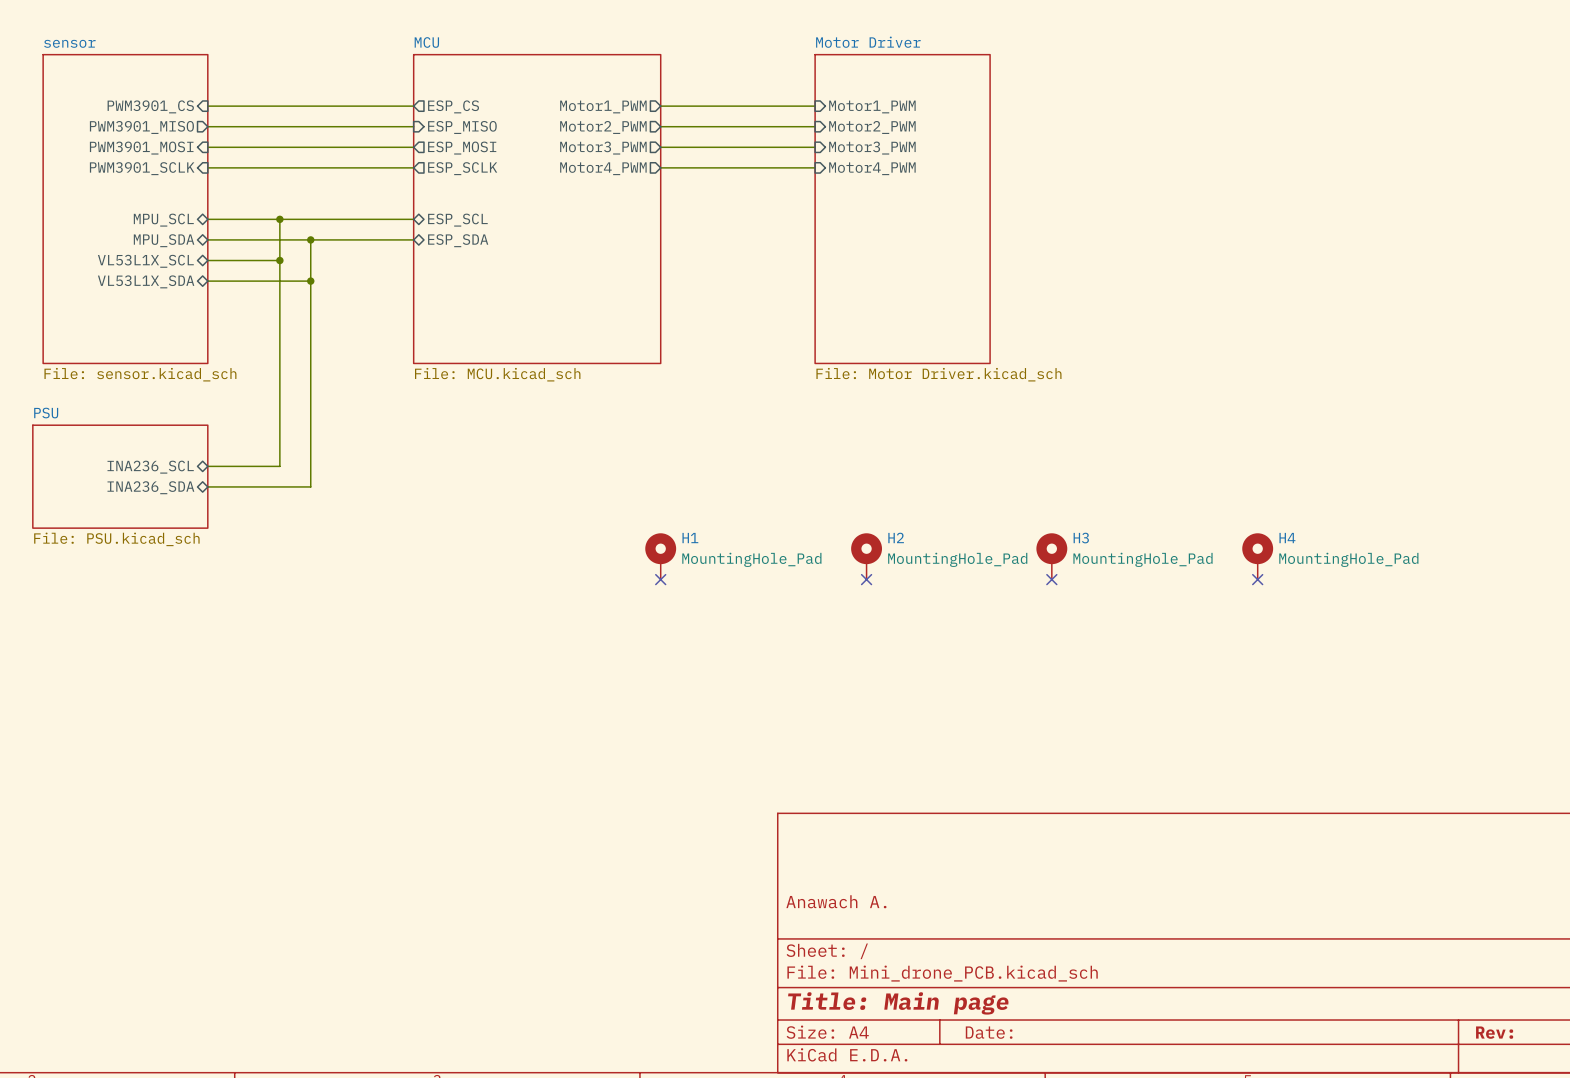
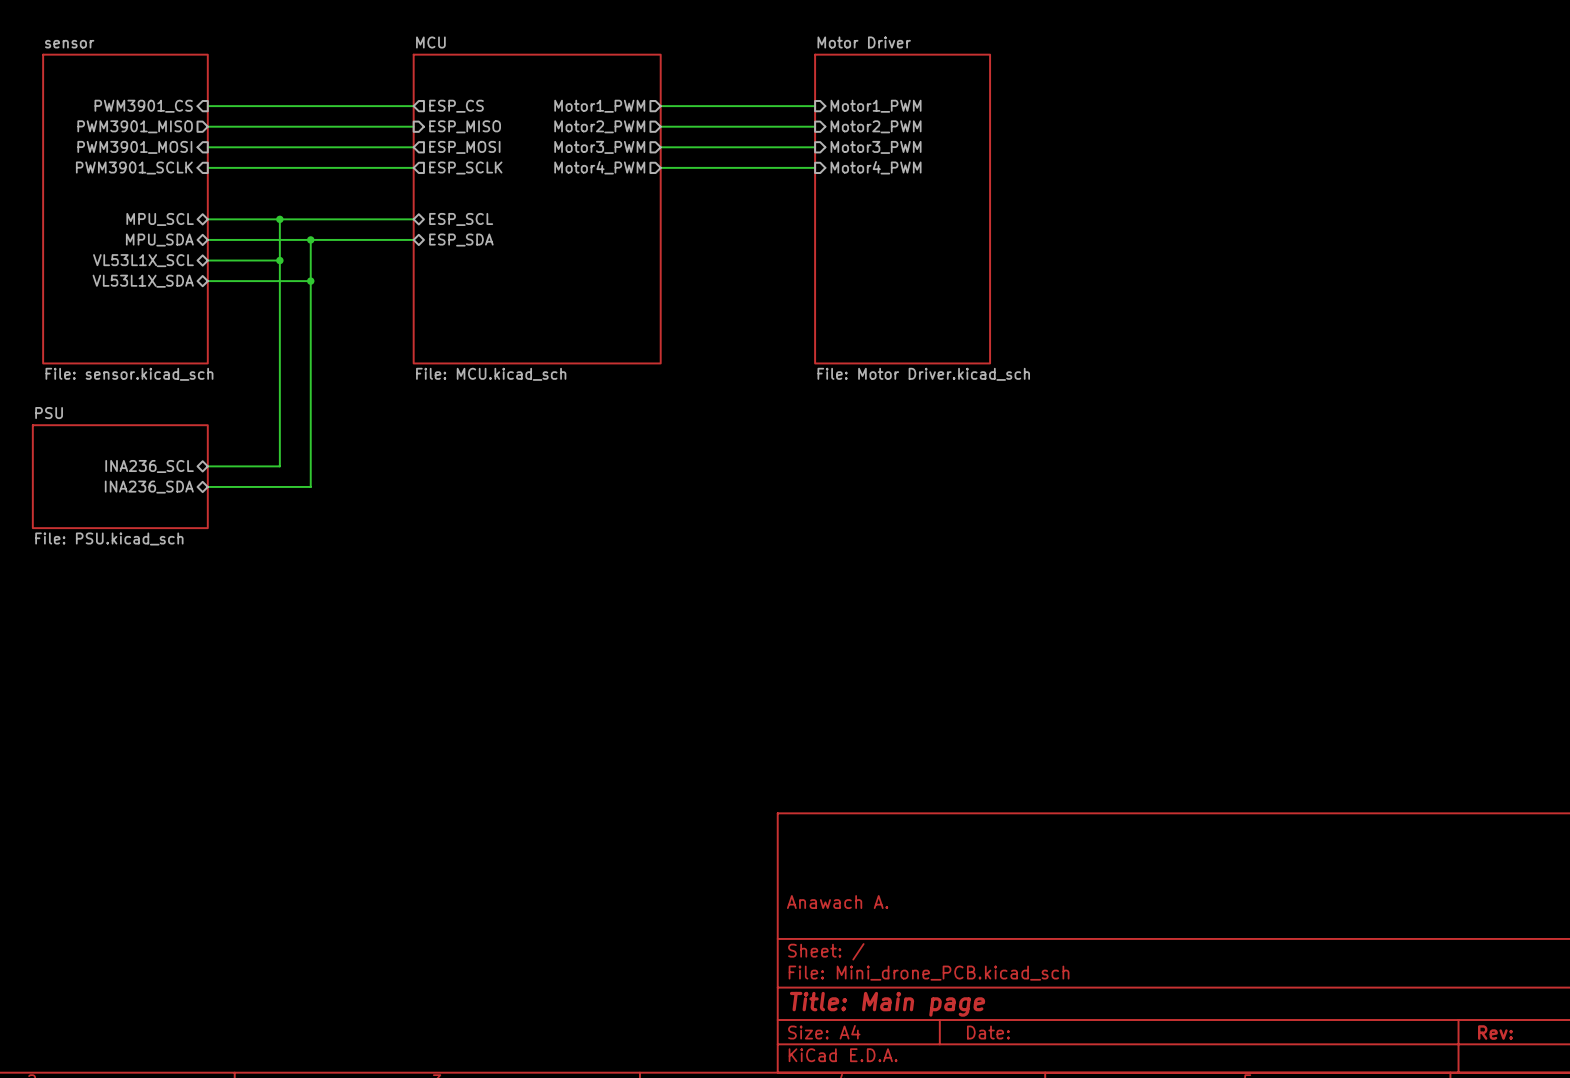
H1: MountingHole_Pad (660, 556) -> none
H2: MountingHole_Pad (866, 556) -> none
H3: MountingHole_Pad (1051, 556) -> none
H4: MountingHole_Pad (1257, 556) -> none
no-connect mark: (660, 579) -> none
no-connect mark: (866, 579) -> none
no-connect mark: (1051, 579) -> none
no-connect mark: (1257, 579) -> none

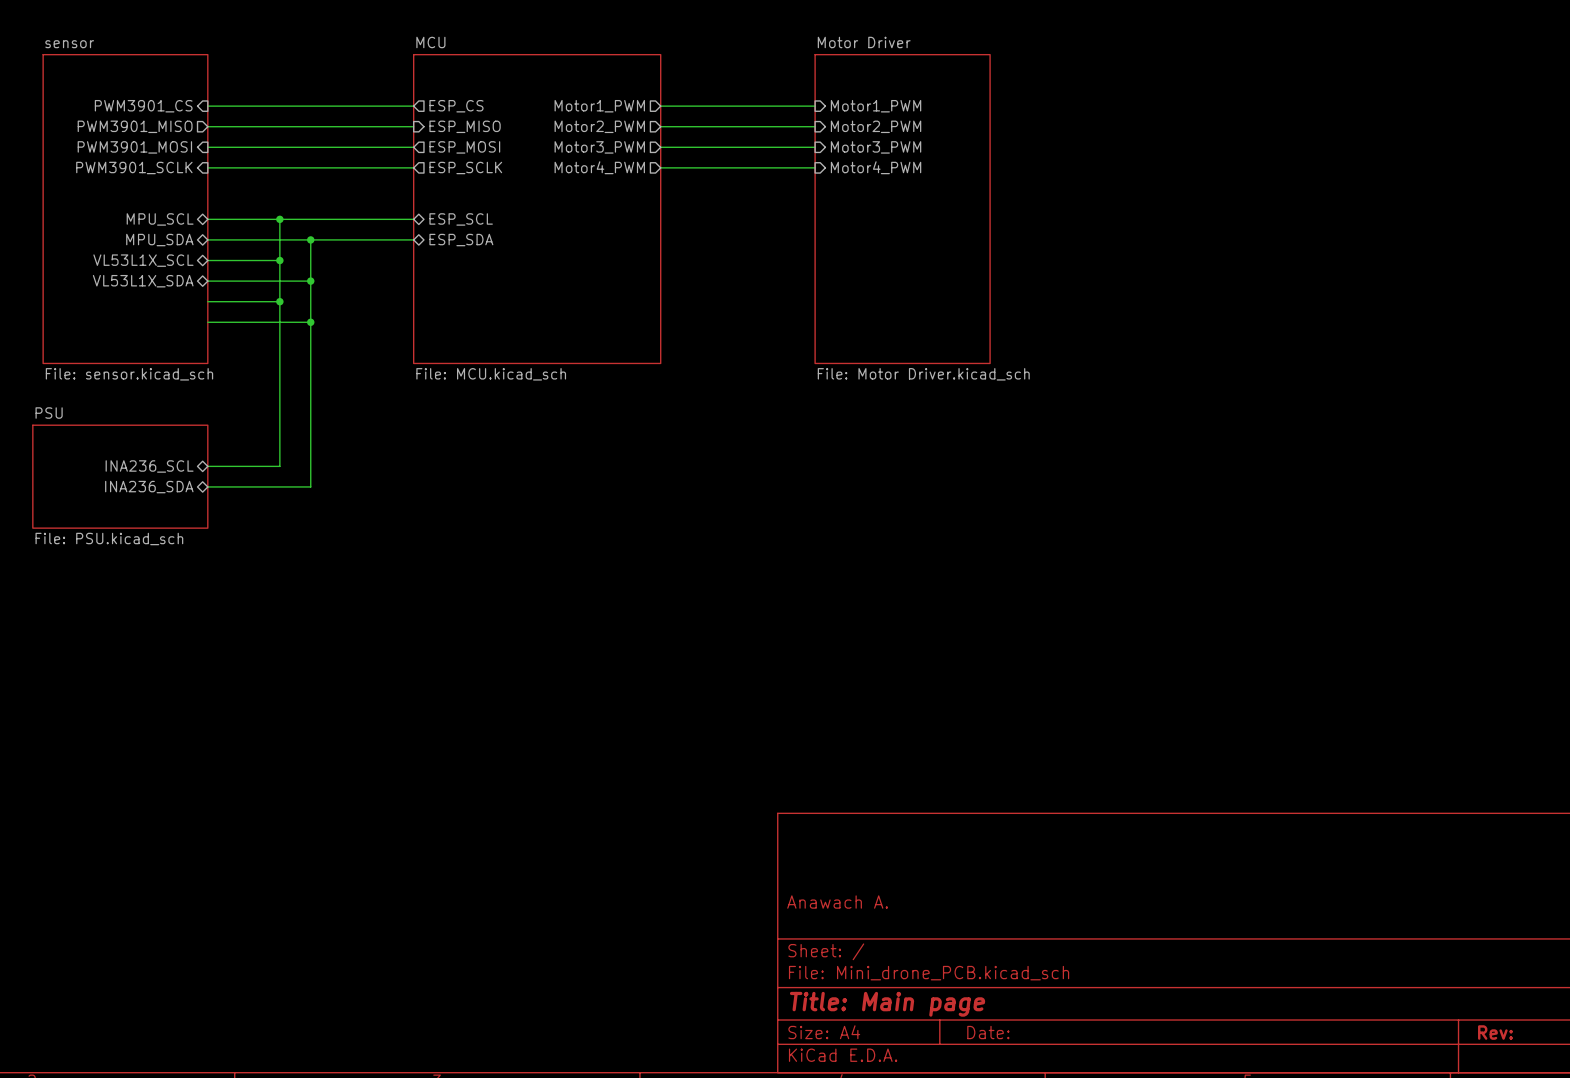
wire: none -> (207, 301) (279, 301)
junction: none -> (279, 301)
wire: none -> (207, 322) (310, 322)
junction: none -> (310, 322)

